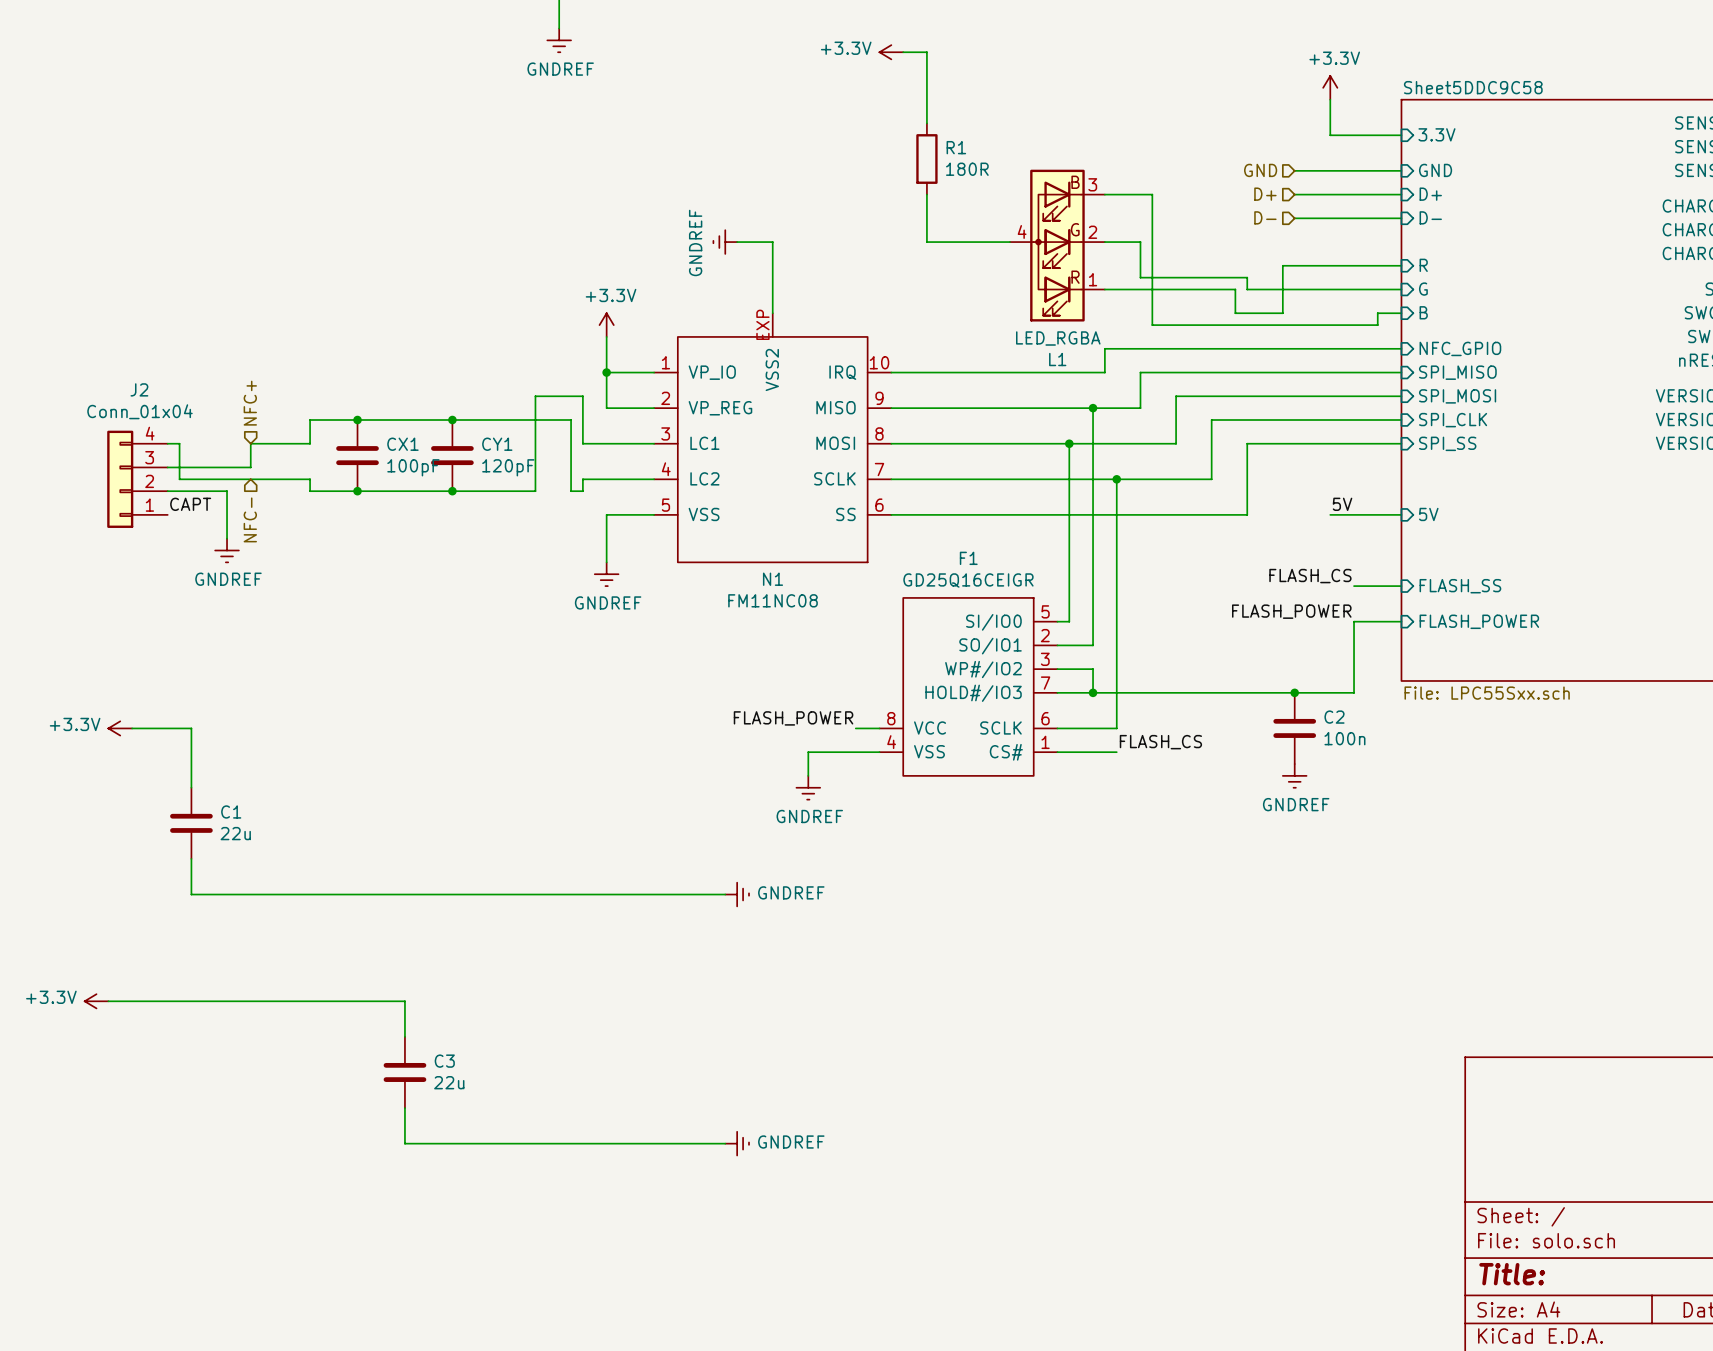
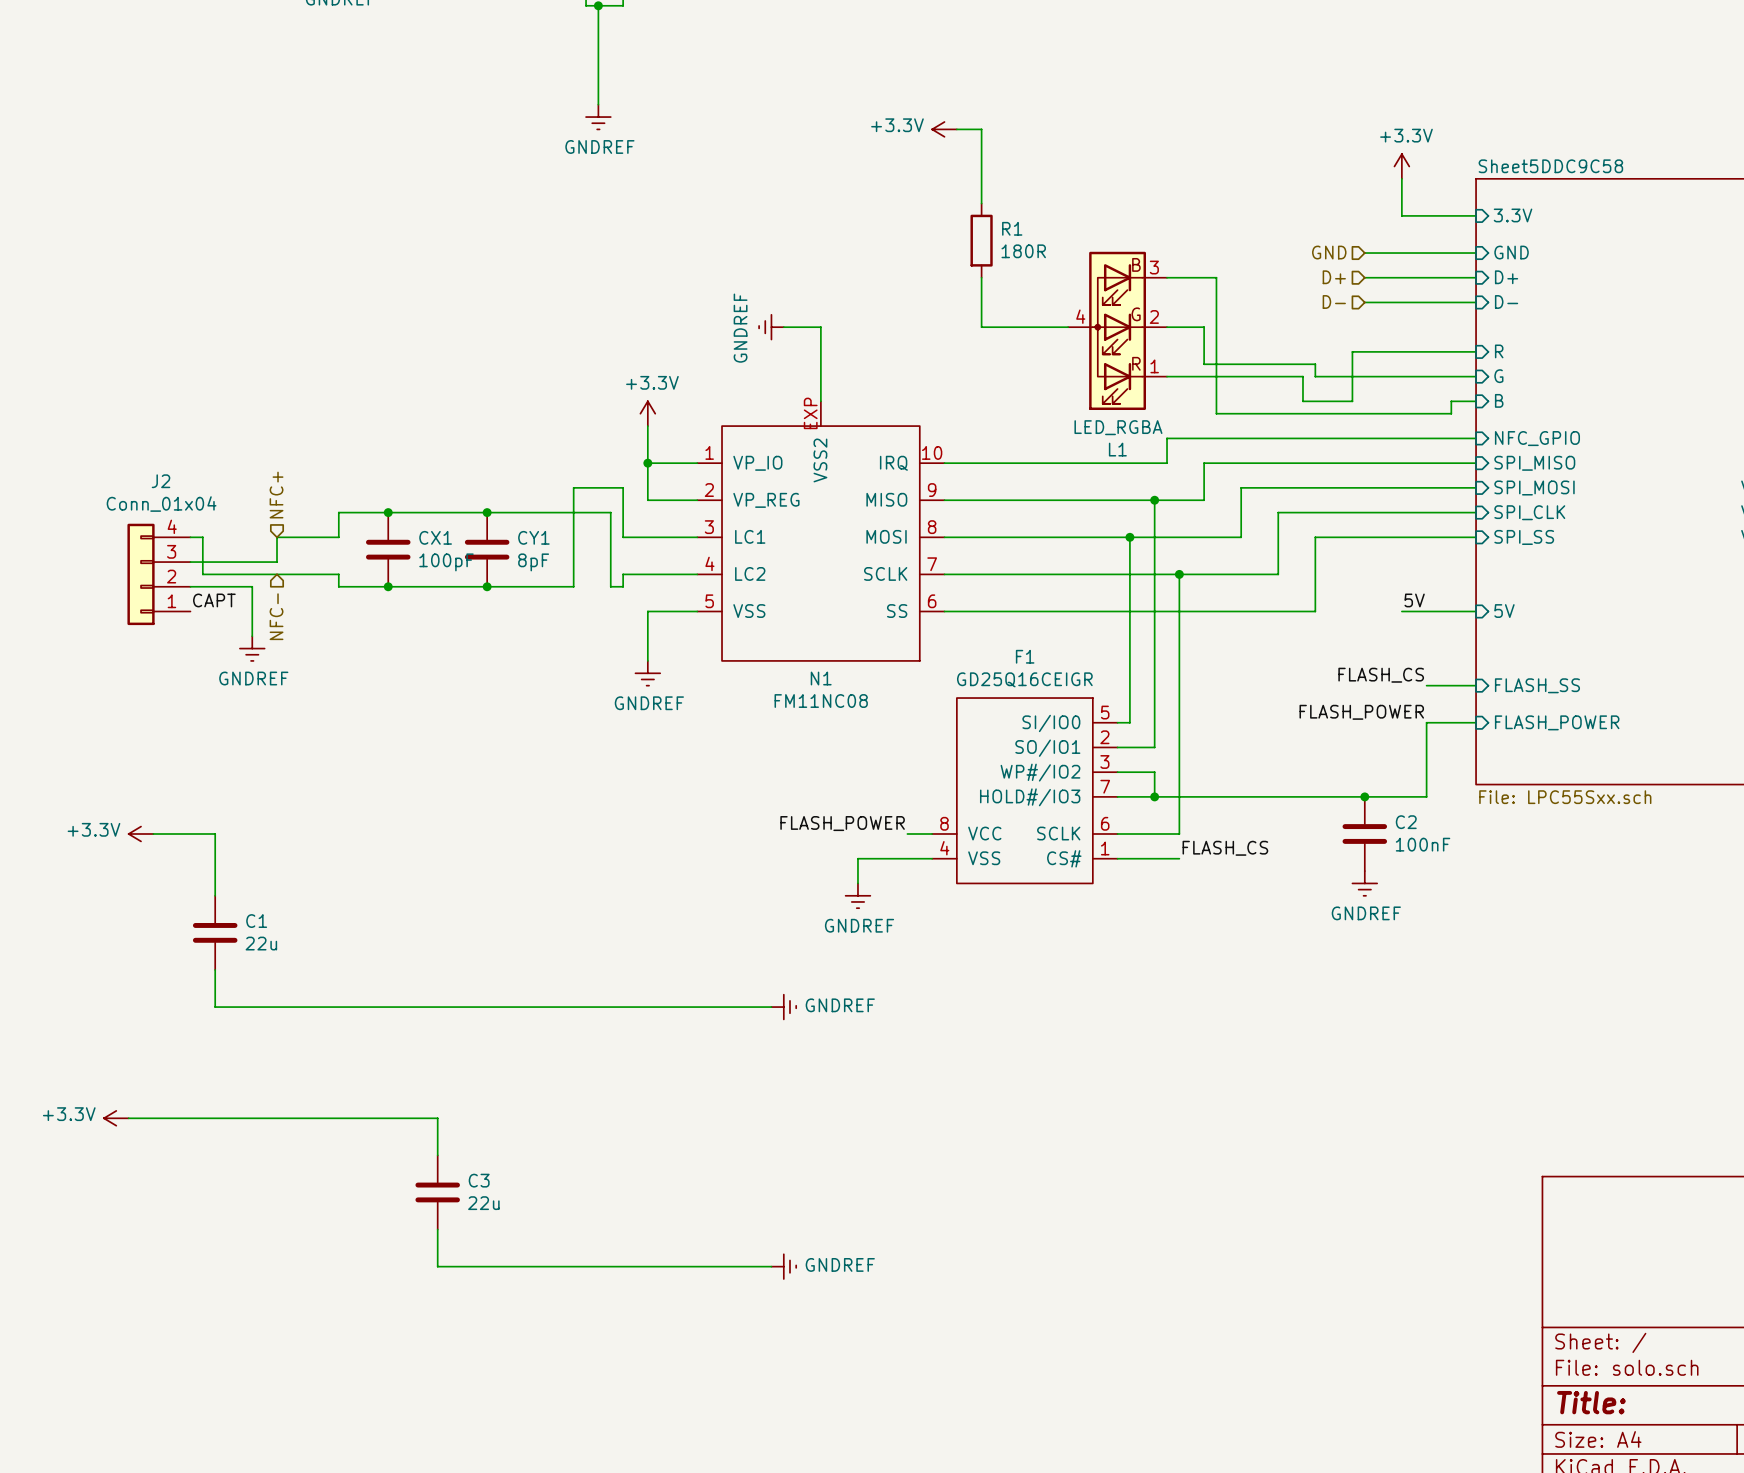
CY1 value: 120pF (508, 467) -> 8pF (533, 562)
C2 value: 100n (1344, 738) -> 100nF (1423, 844)

